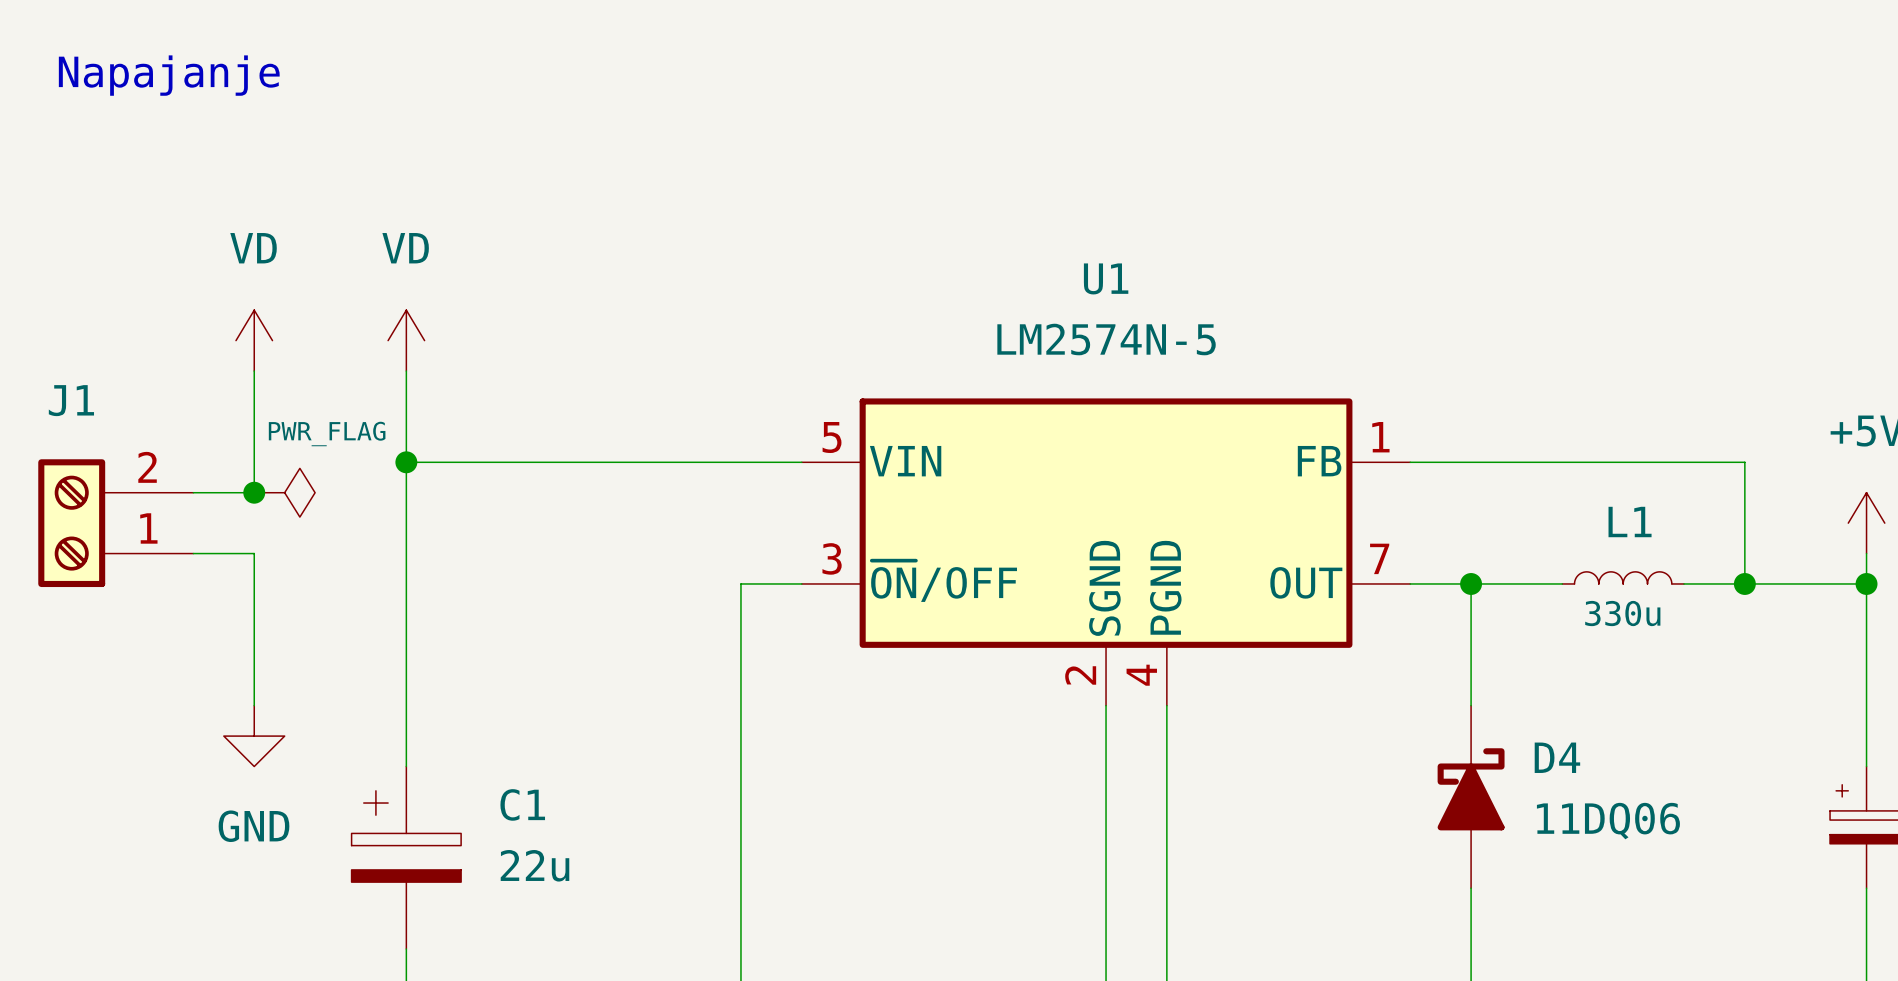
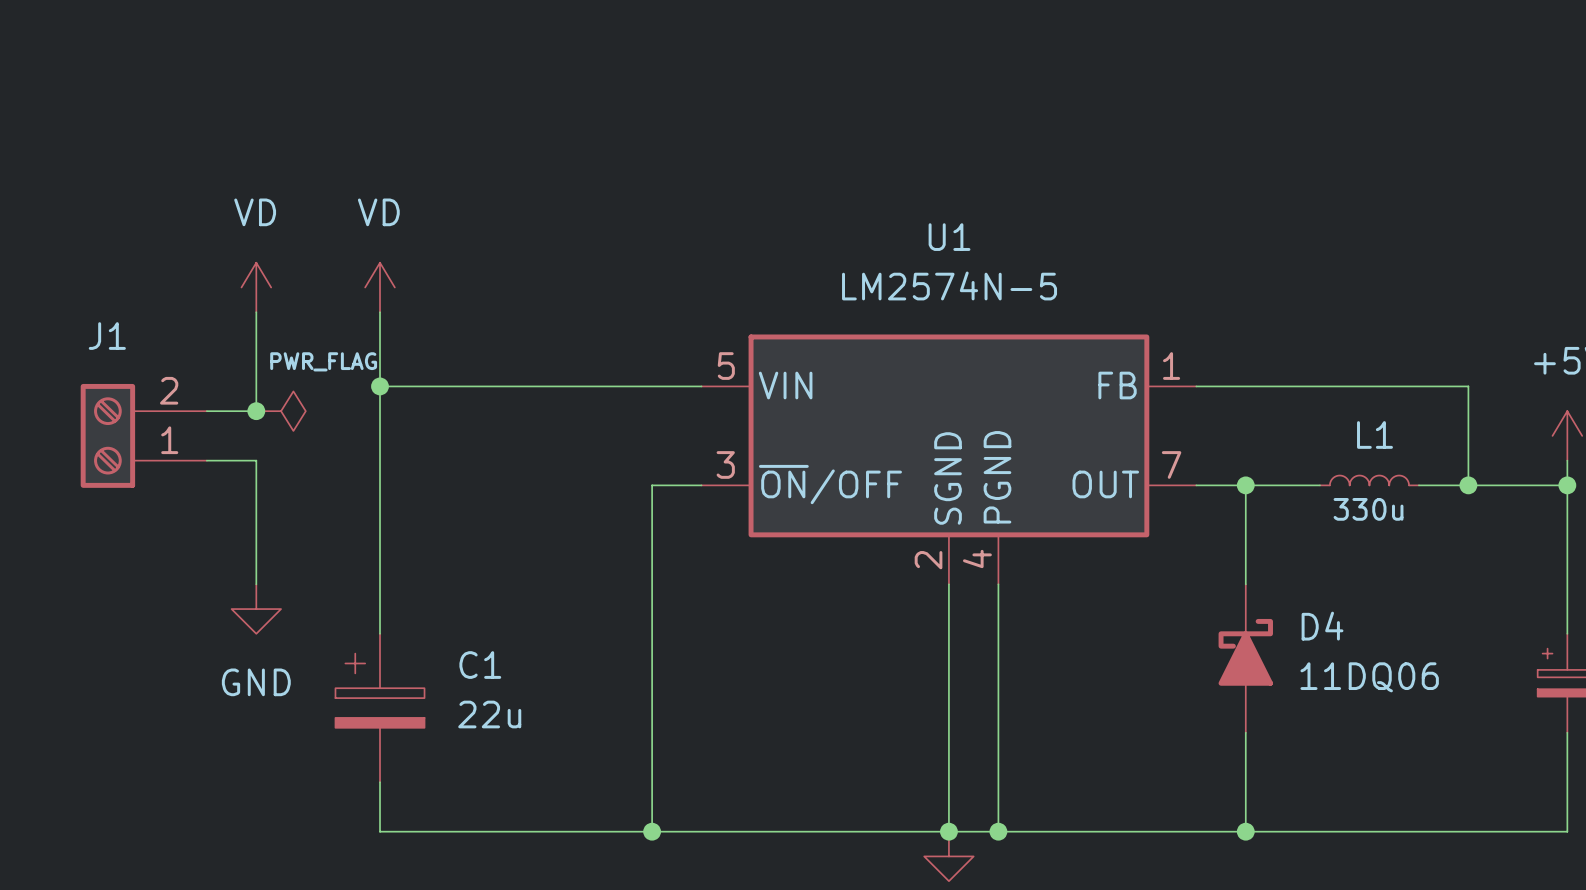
text: Napajanje (169, 75) -> none

